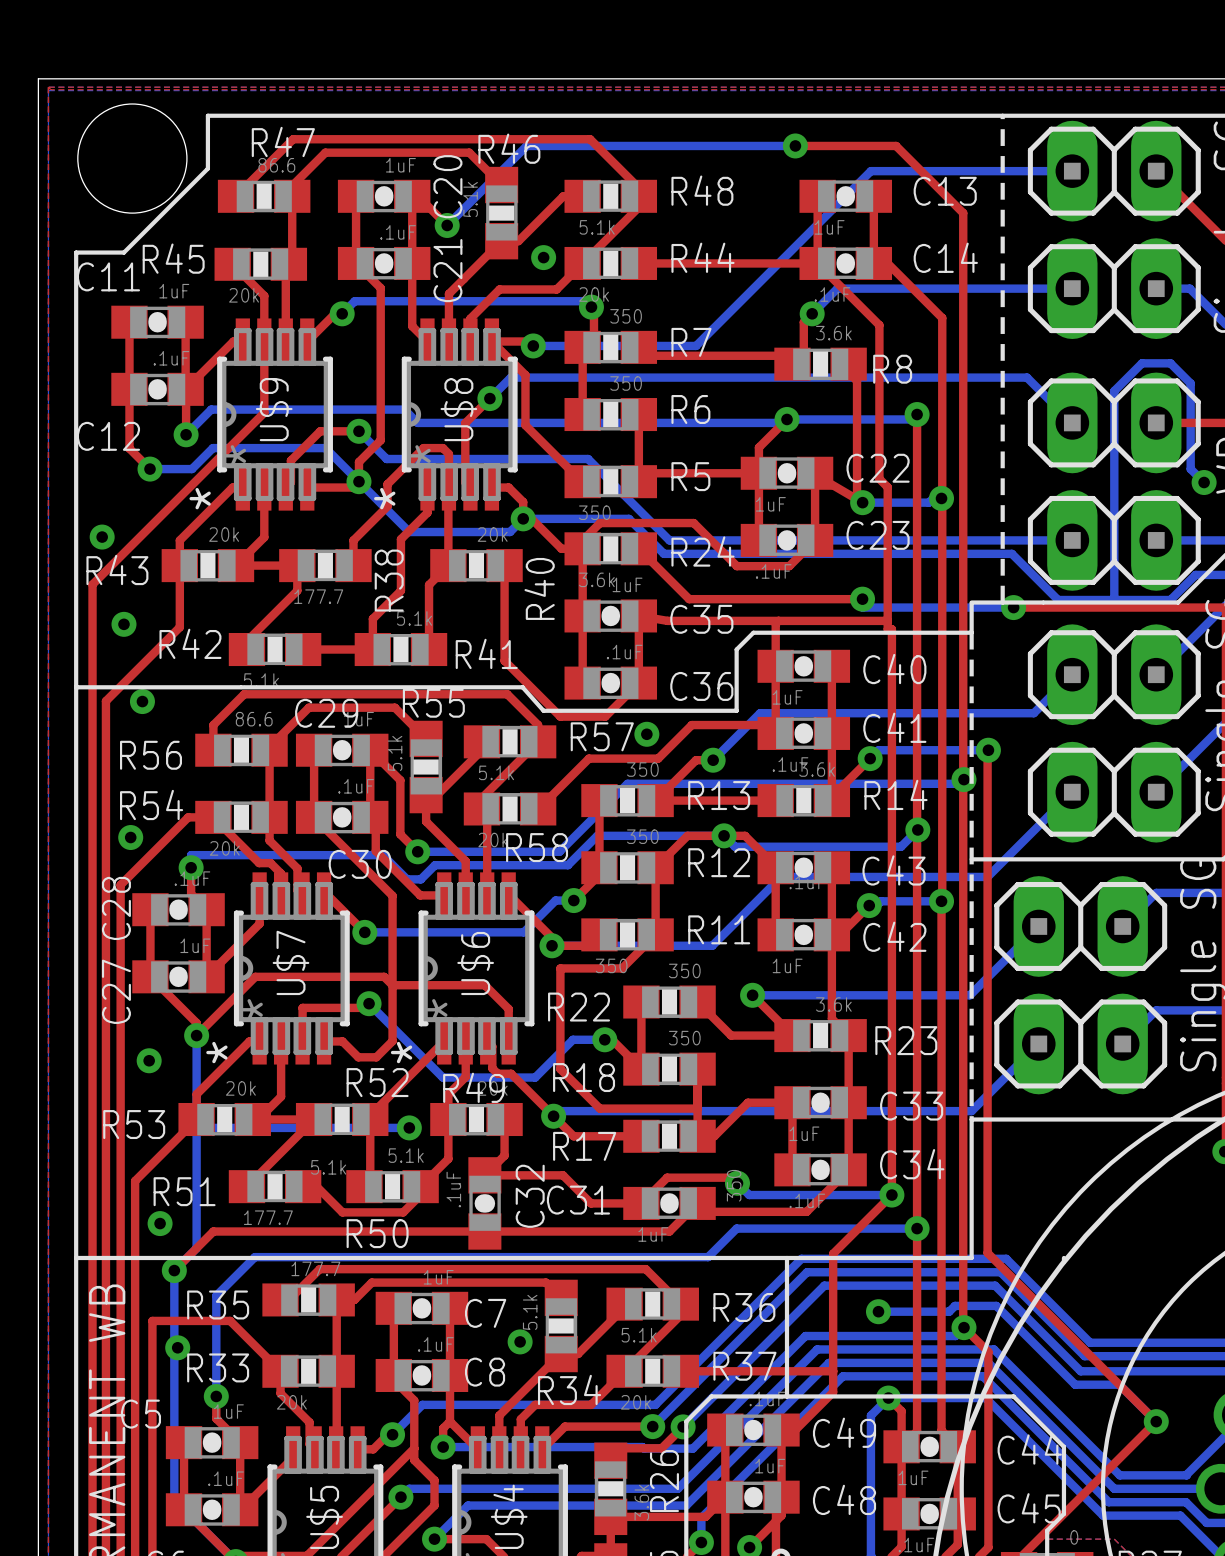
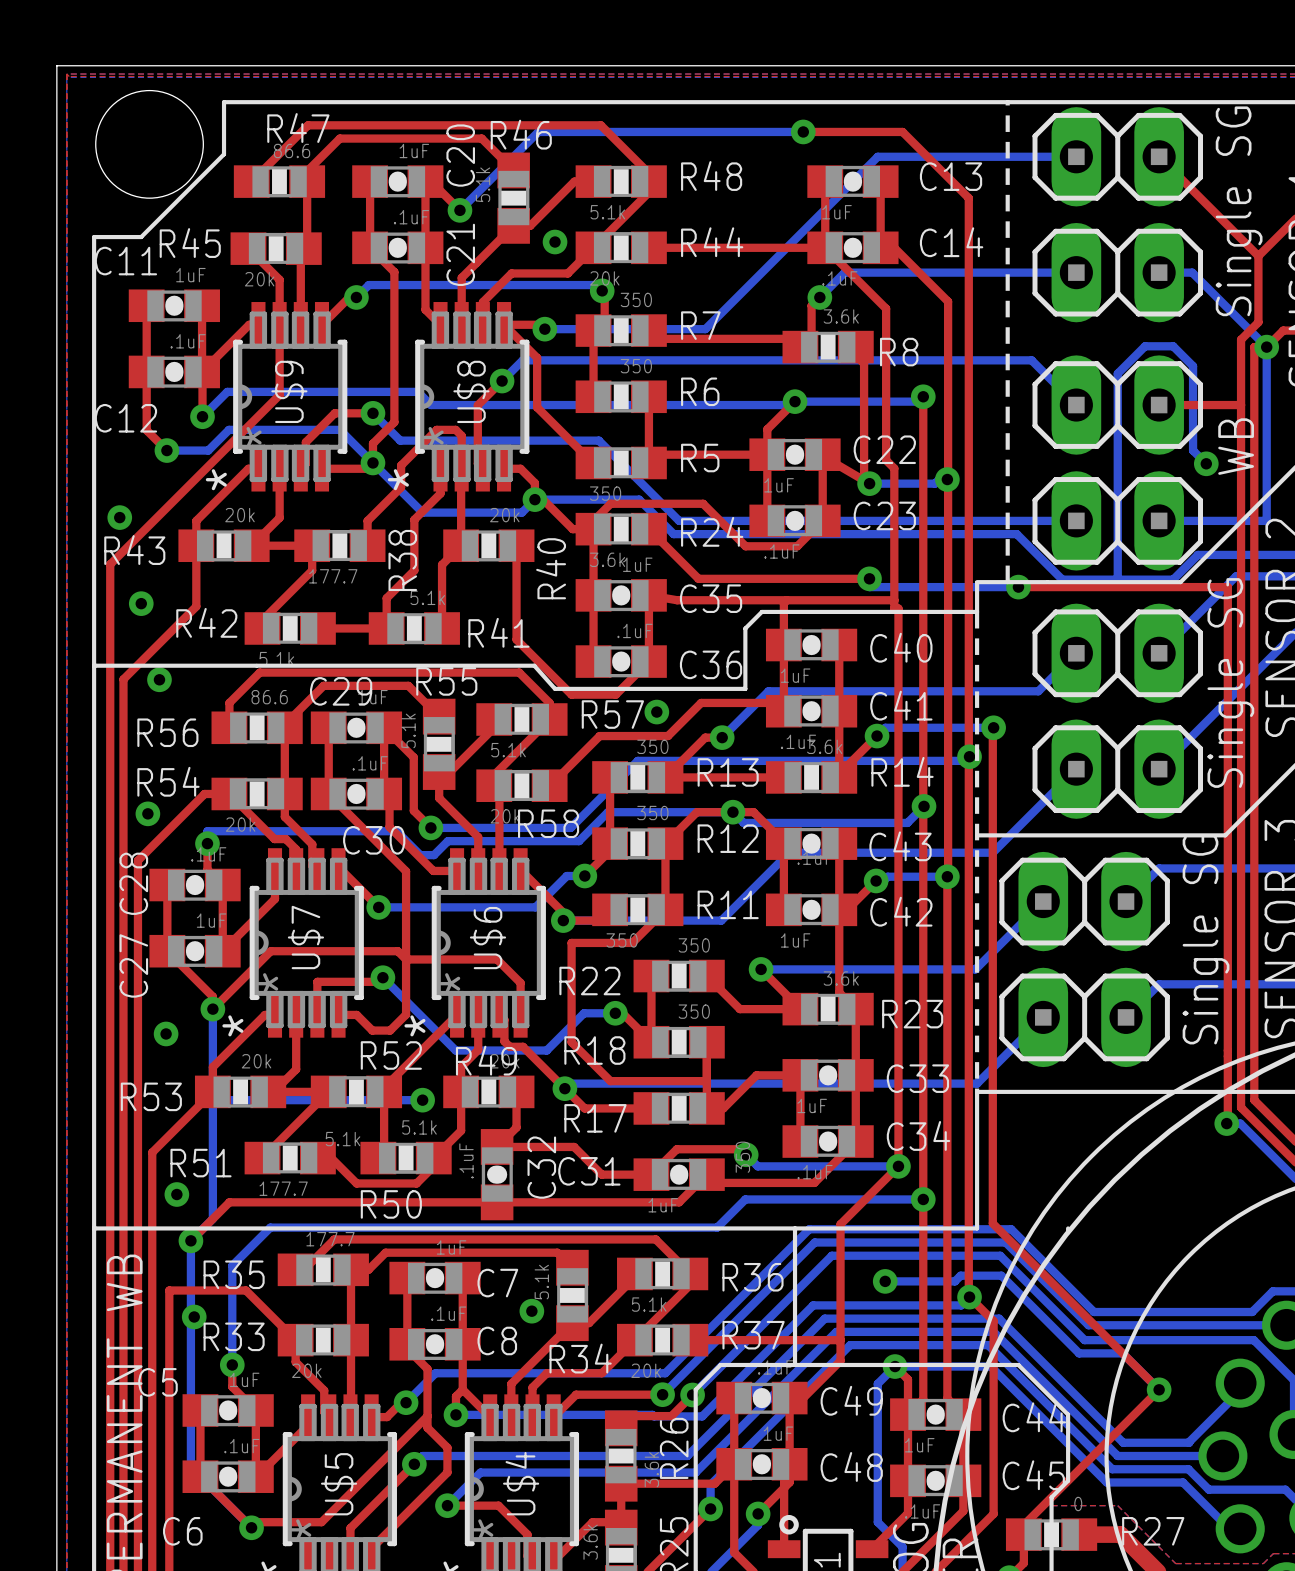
C20 name position: C20 (447, 186) -> C20 (460, 155)

